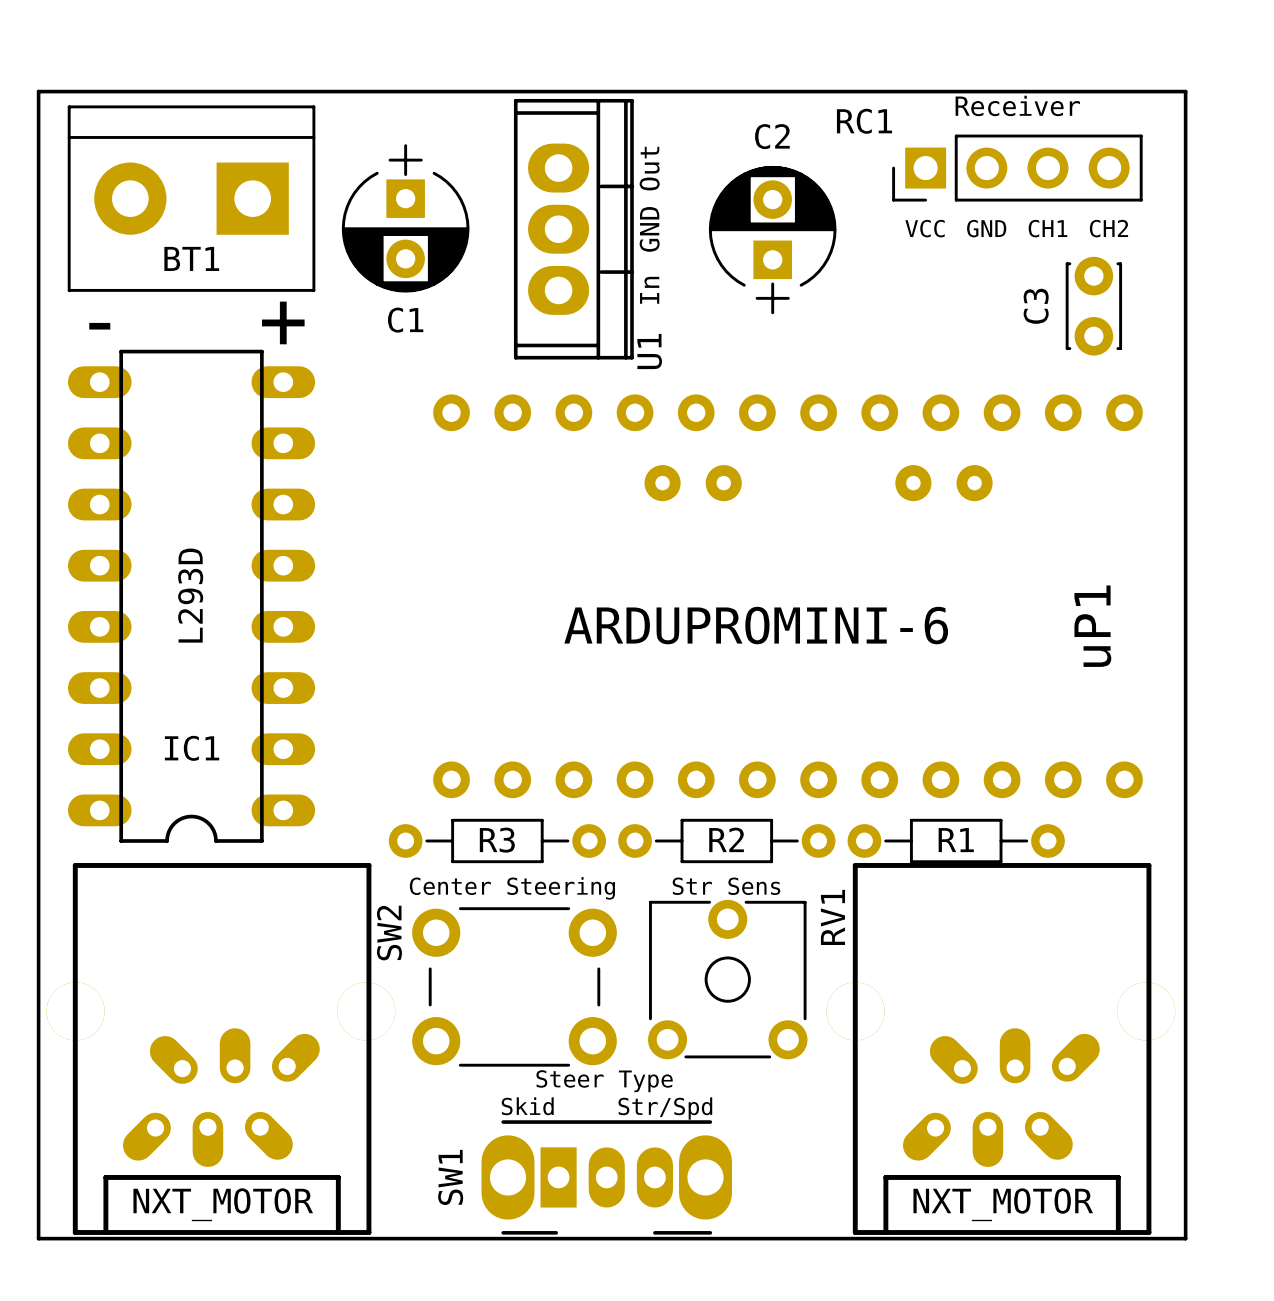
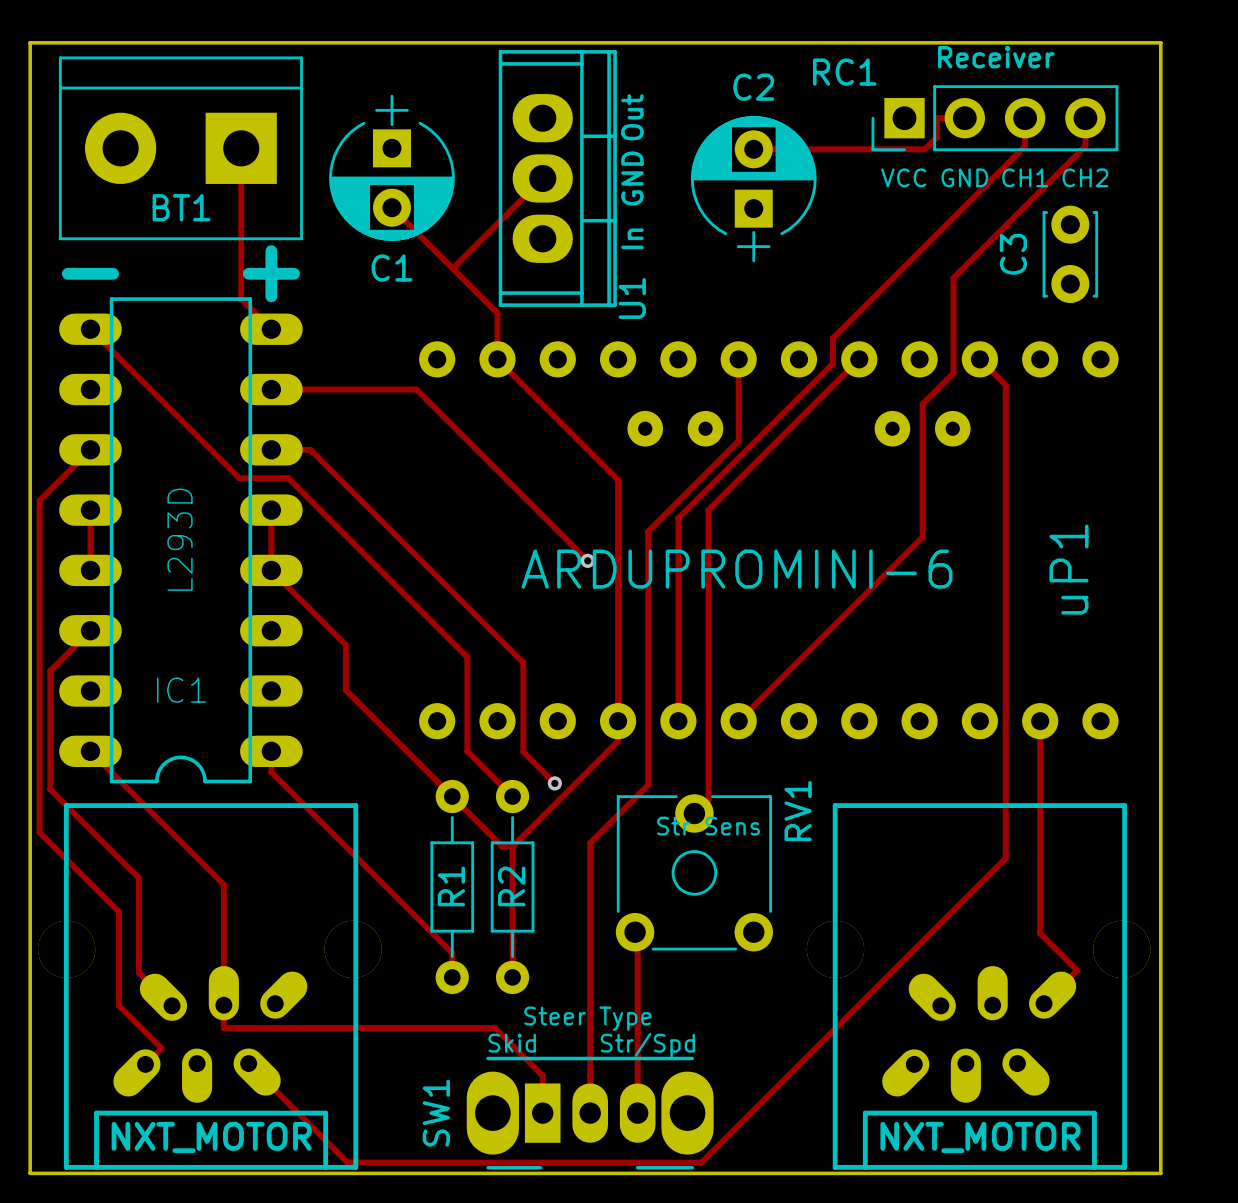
track: none -> (964, 118) (936, 118) (936, 137) (924, 149) (753, 149)
track: none -> (1025, 118) (1025, 146) (832, 338) (832, 363) (678, 518) (678, 721)
track: none -> (1085, 118) (1085, 146) (953, 277) (953, 373) (922, 404) (922, 537) (738, 721)
track: none -> (241, 148) (241, 299) (271, 329)
track: none -> (542, 178) (452, 268)
track: none -> (391, 207) (497, 313) (497, 359) (618, 479) (618, 741) (512, 846)
track: none -> (90, 329) (239, 478) (288, 478) (467, 657) (467, 751) (512, 796)
track: none -> (738, 359) (738, 441) (648, 531) (648, 784) (590, 842) (590, 1113)
track: none -> (859, 359) (708, 510) (708, 799) (694, 813)
track: none -> (979, 359) (1005, 385) (1005, 858) (701, 1162) (347, 1162) (248, 1063)
track: none -> (271, 389) (416, 389) (587, 560)
track: none -> (90, 449) (39, 500) (39, 832) (119, 911) (119, 1005) (161, 1048) (145, 1064)
track: none -> (271, 449) (310, 449) (523, 662) (523, 751) (554, 783)
track: none -> (90, 510) (90, 570)
track: none -> (271, 510) (271, 570) (345, 644) (345, 690) (502, 846) (512, 846)
via: none -> (587, 560)
track: none -> (90, 630) (50, 670) (50, 789) (138, 878) (138, 972) (172, 1005)
track: none -> (1040, 721) (1040, 933) (1077, 970) (1044, 1003)
track: none -> (90, 751) (223, 884) (223, 1028) (495, 1028) (542, 1075) (542, 1113)
track: none -> (271, 751) (271, 772) (452, 953) (452, 977)
R3: (497, 840) -> none
R2 rotation: 0° (726, 840) -> 90° clockwise (512, 886)
R2 position: (726, 840) -> (512, 886)
R1 rotation: 0° (956, 840) -> 90° clockwise (452, 886)
R1 position: (956, 840) -> (452, 886)
via: none -> (554, 783)
text: Center Steering (512, 888) -> none
track: none -> (512, 846) (512, 977)
RV1 position: (727, 979) -> (694, 872)
SW2: (514, 986) -> none
track: none -> (635, 932) (637, 934) (637, 1113)

